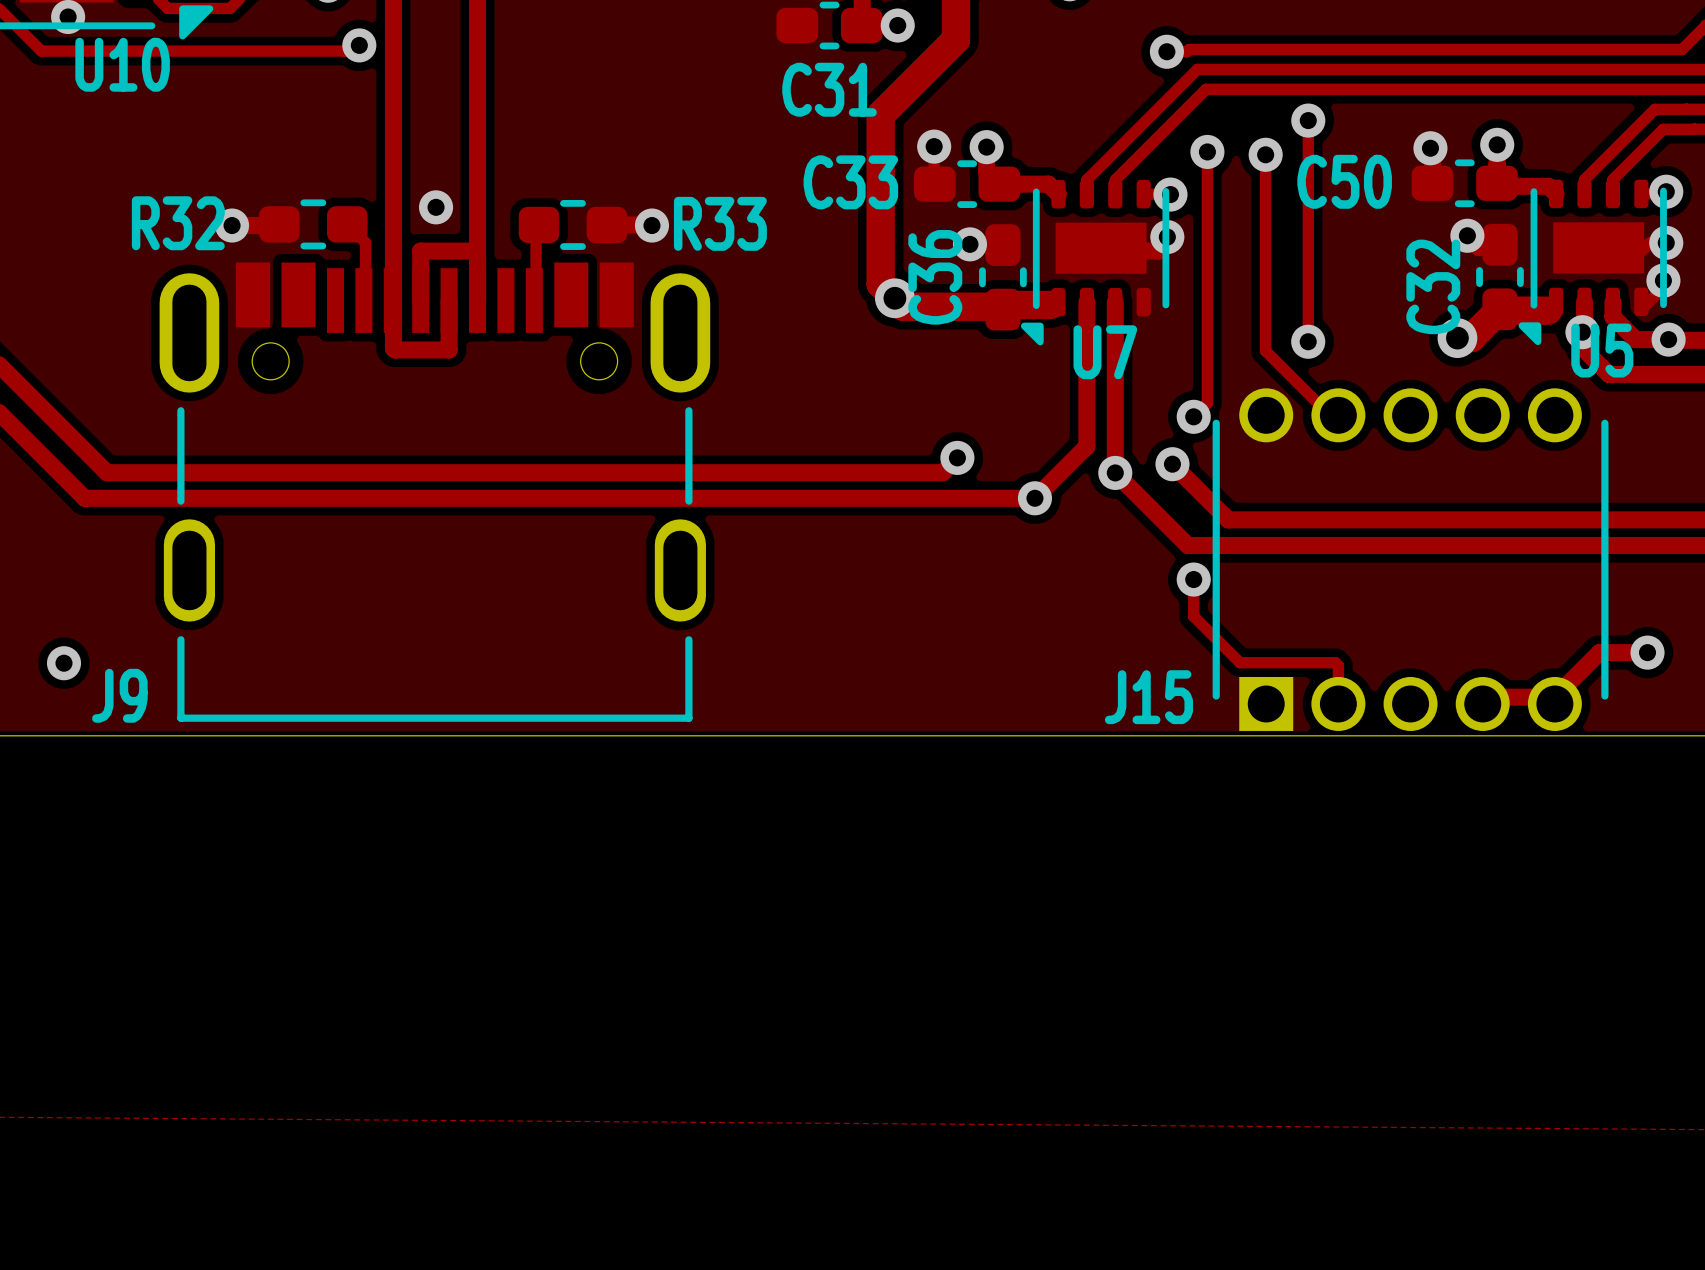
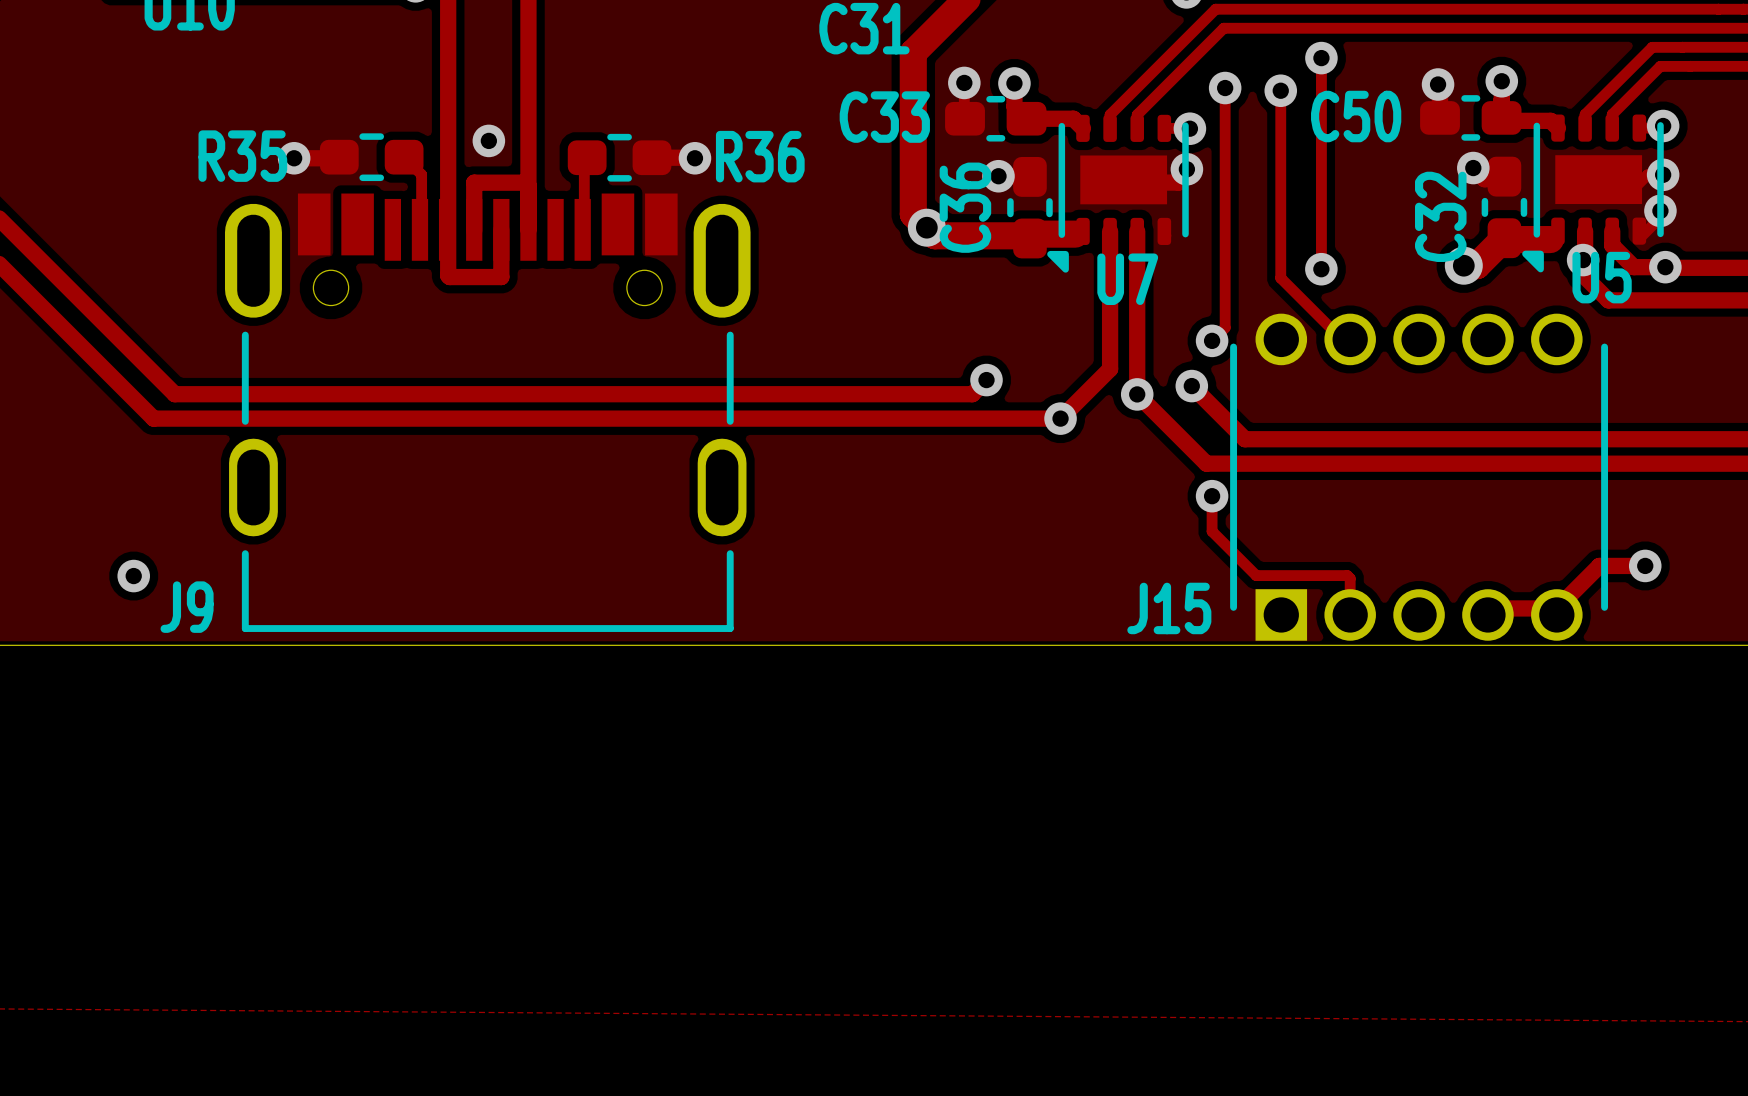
R32 name: R32 (178, 223) -> R35 (242, 156)
R33 name: R33 (720, 223) -> R36 (760, 156)

